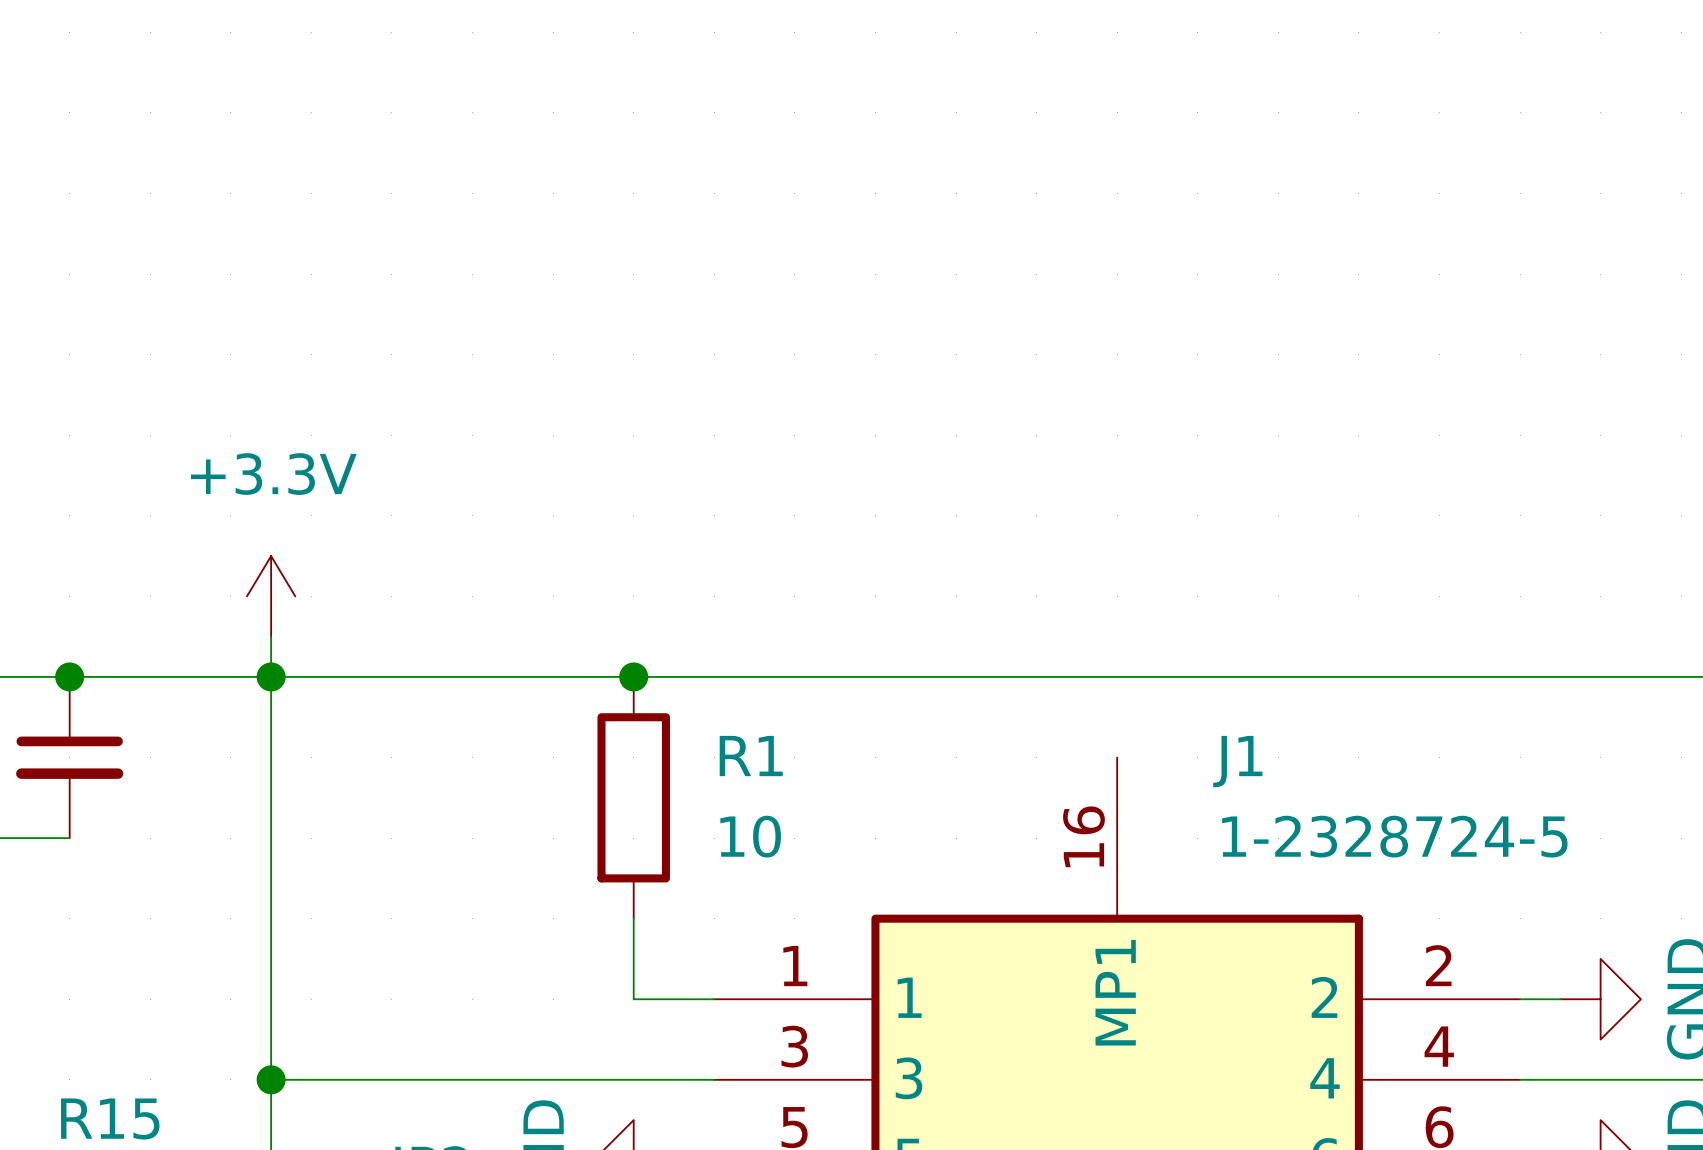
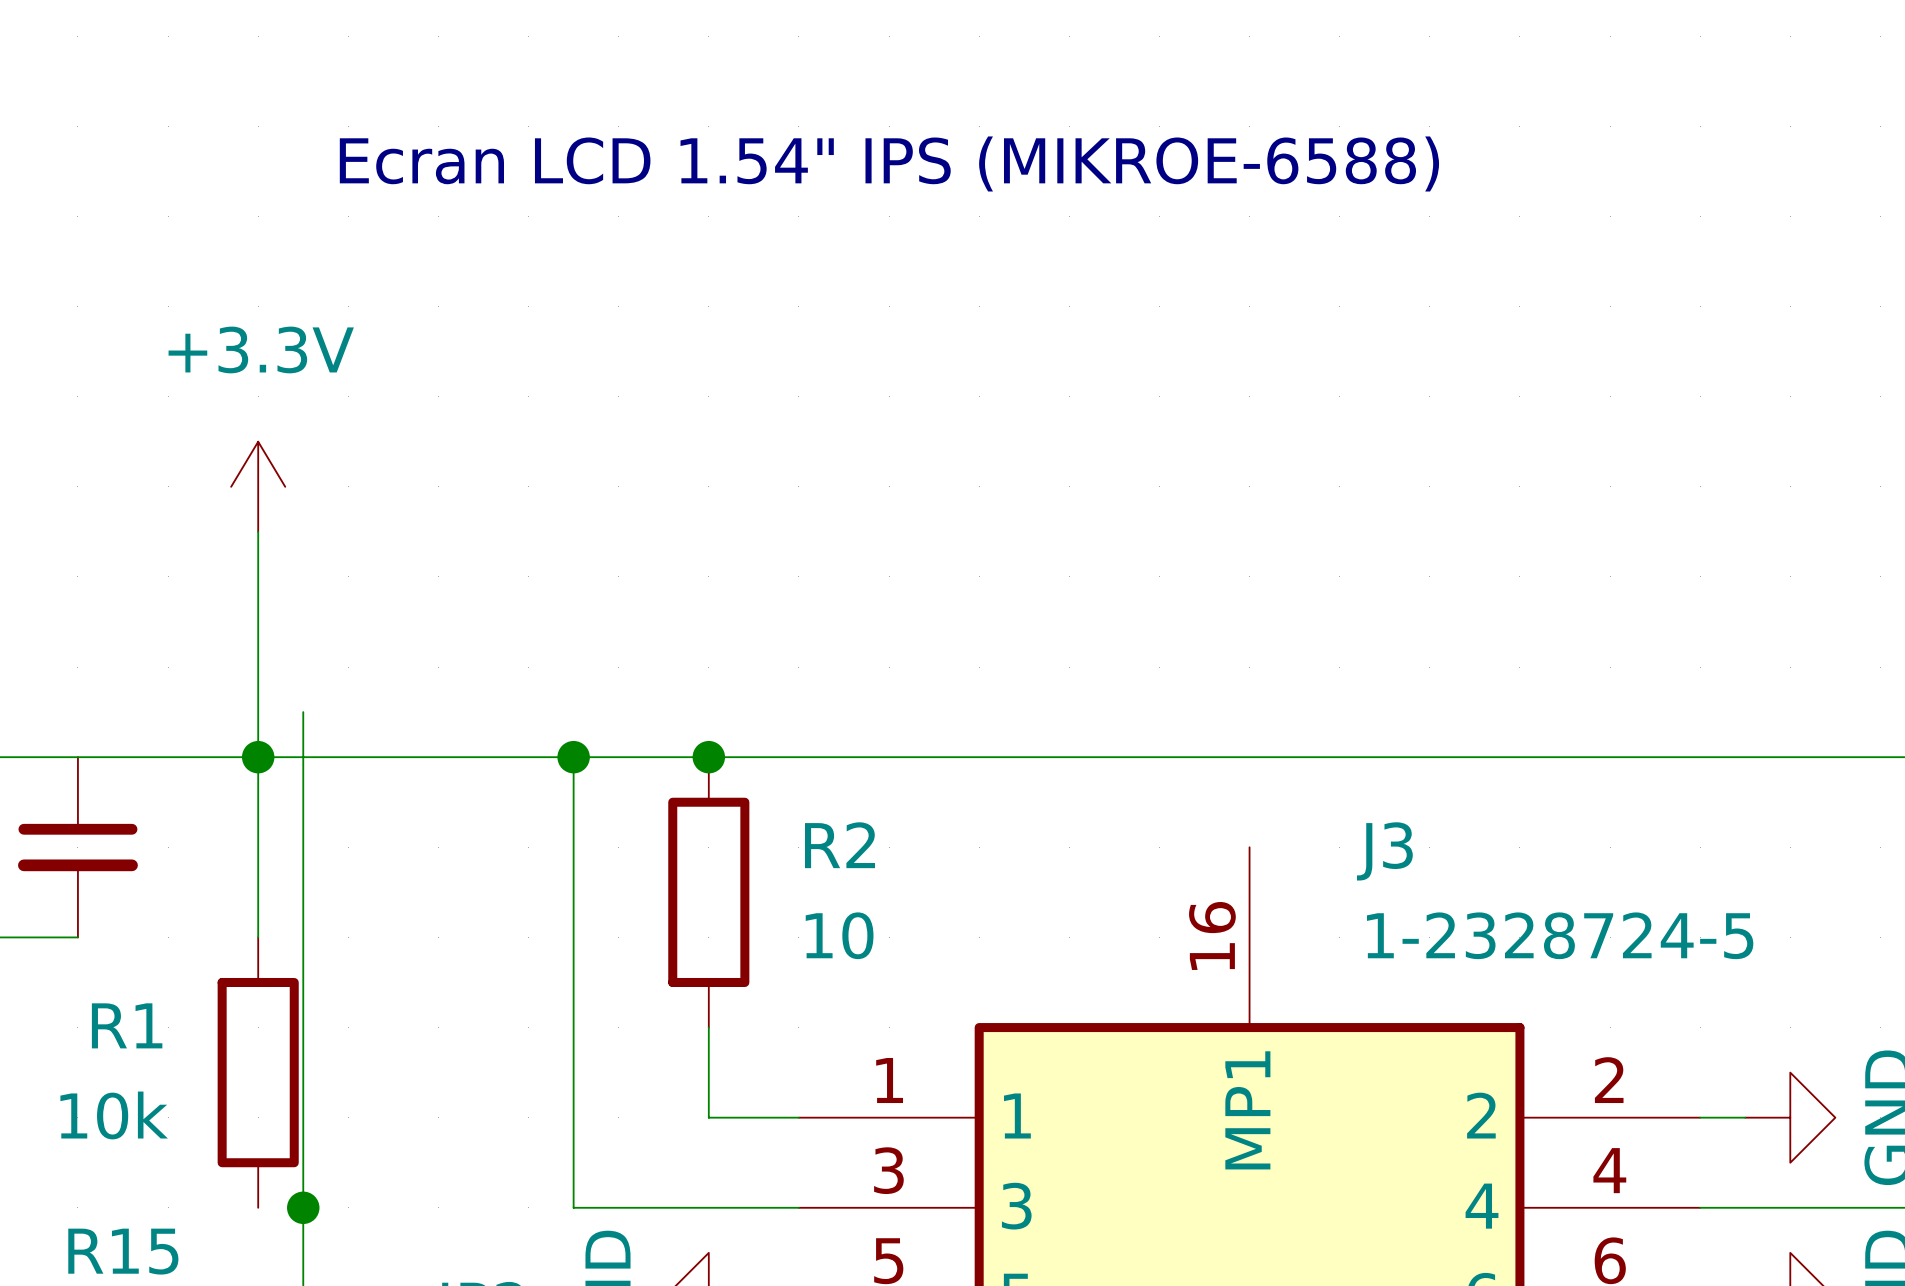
text: none -> Ecran LCD 1.54" IPS (MIKROE-6588) (889, 163)
wire: none -> (258, 531) (258, 937)
power symbol position: +3.3V (271, 596) -> +3.3V (258, 486)
junction: (69, 676) -> none
junction position: (271, 676) -> (258, 757)
junction: none -> (573, 757)
R1 name: R1 (751, 756) -> R2 (840, 845)
J1 name: J1 (1237, 761) -> J3 (1384, 851)
R1: none -> 10k (258, 1072)
wire: (271, 1079) (512, 1079) -> (573, 757) (573, 1207)

